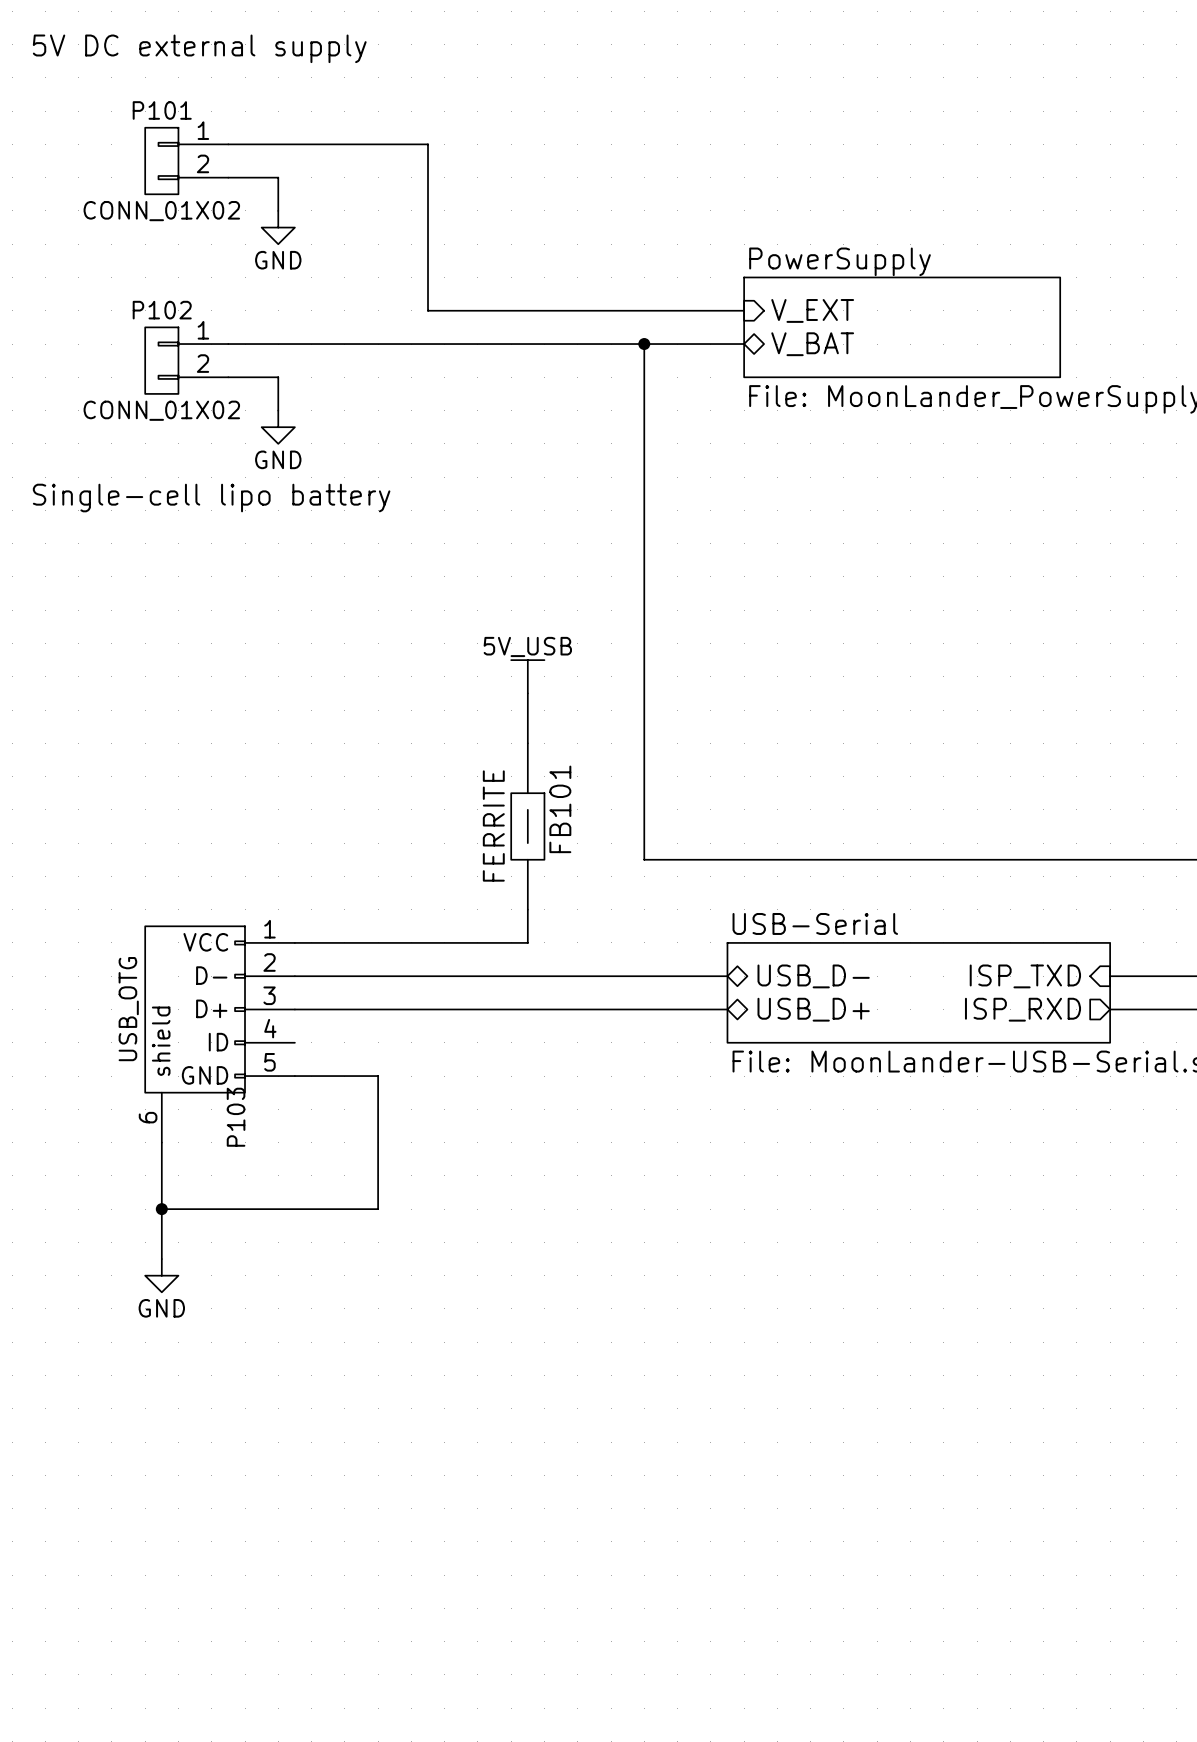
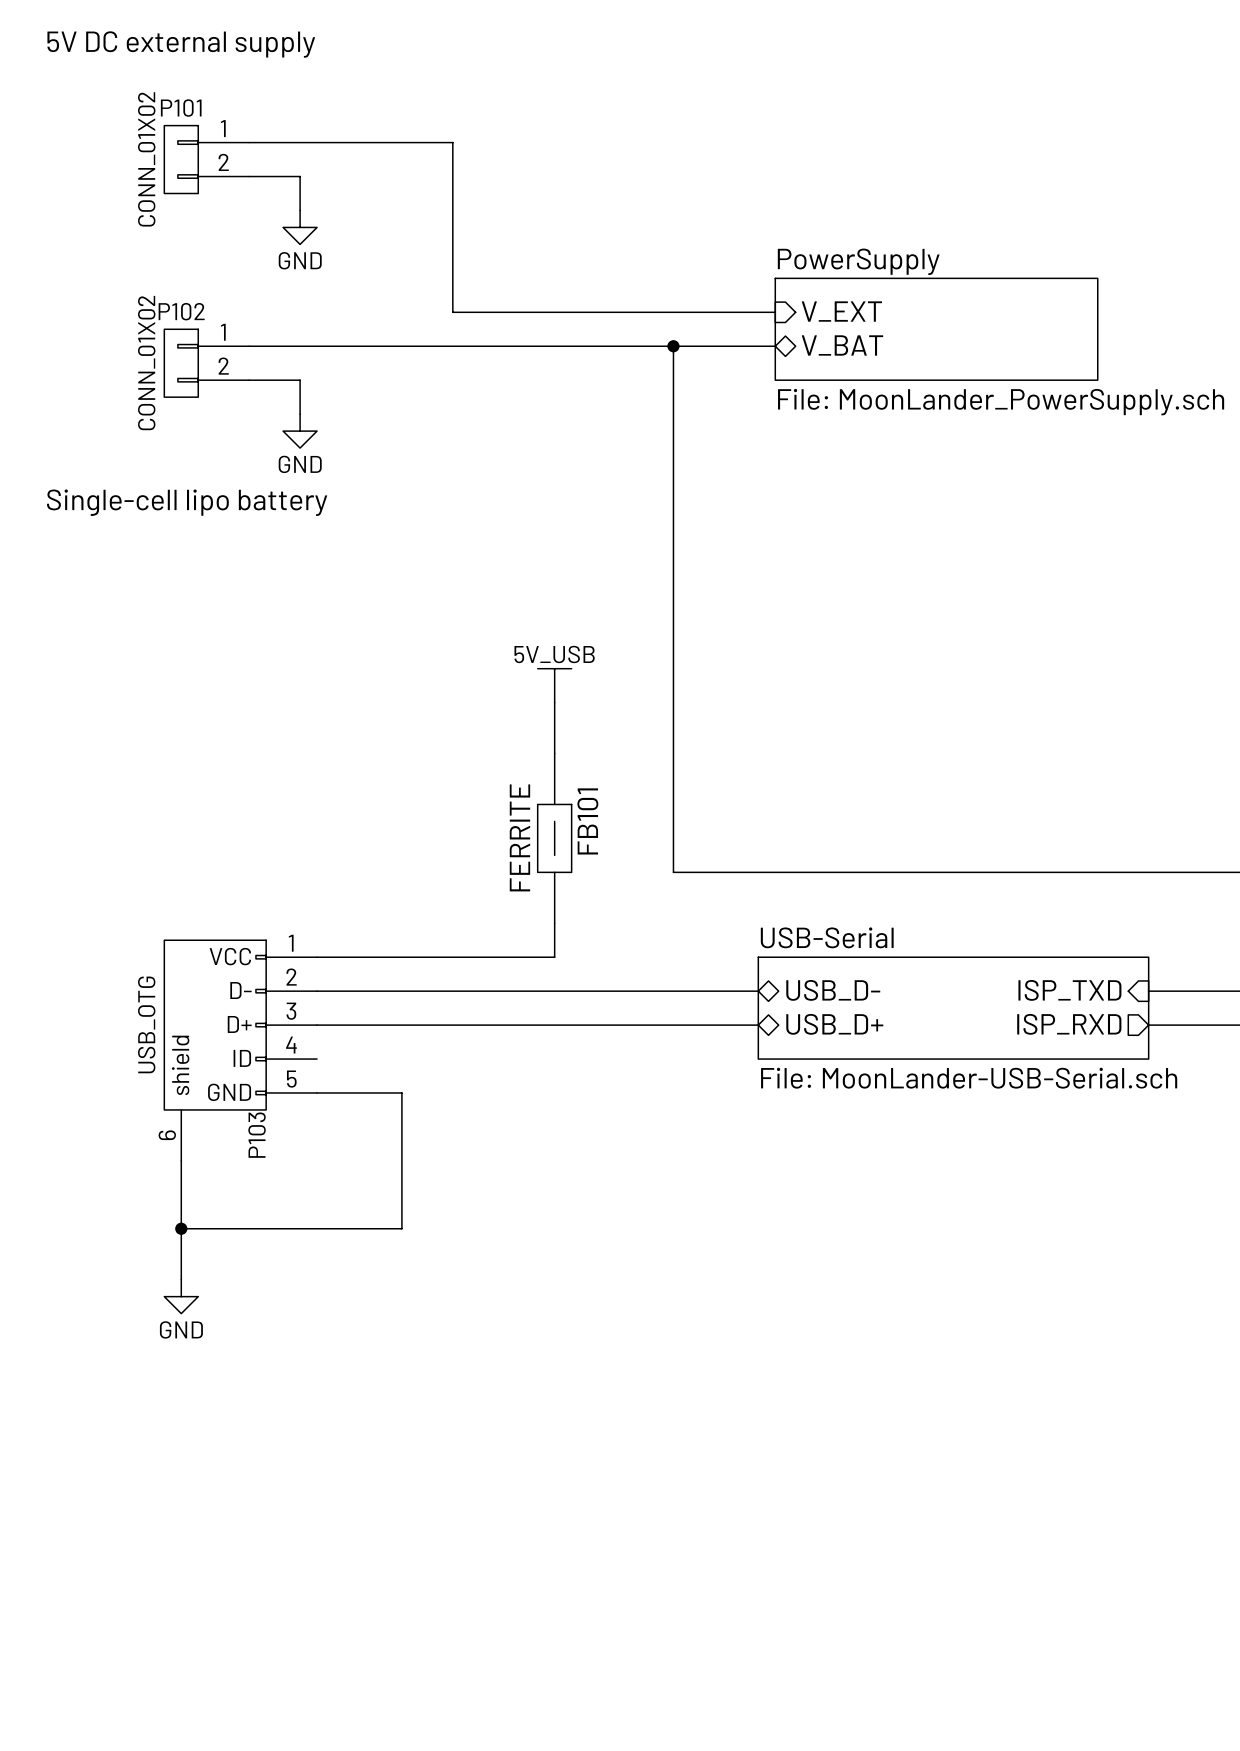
P101 value rotation: 0° (161, 211) -> 90° counterclockwise (146, 159)
P102 value rotation: 0° (161, 410) -> 90° counterclockwise (146, 363)

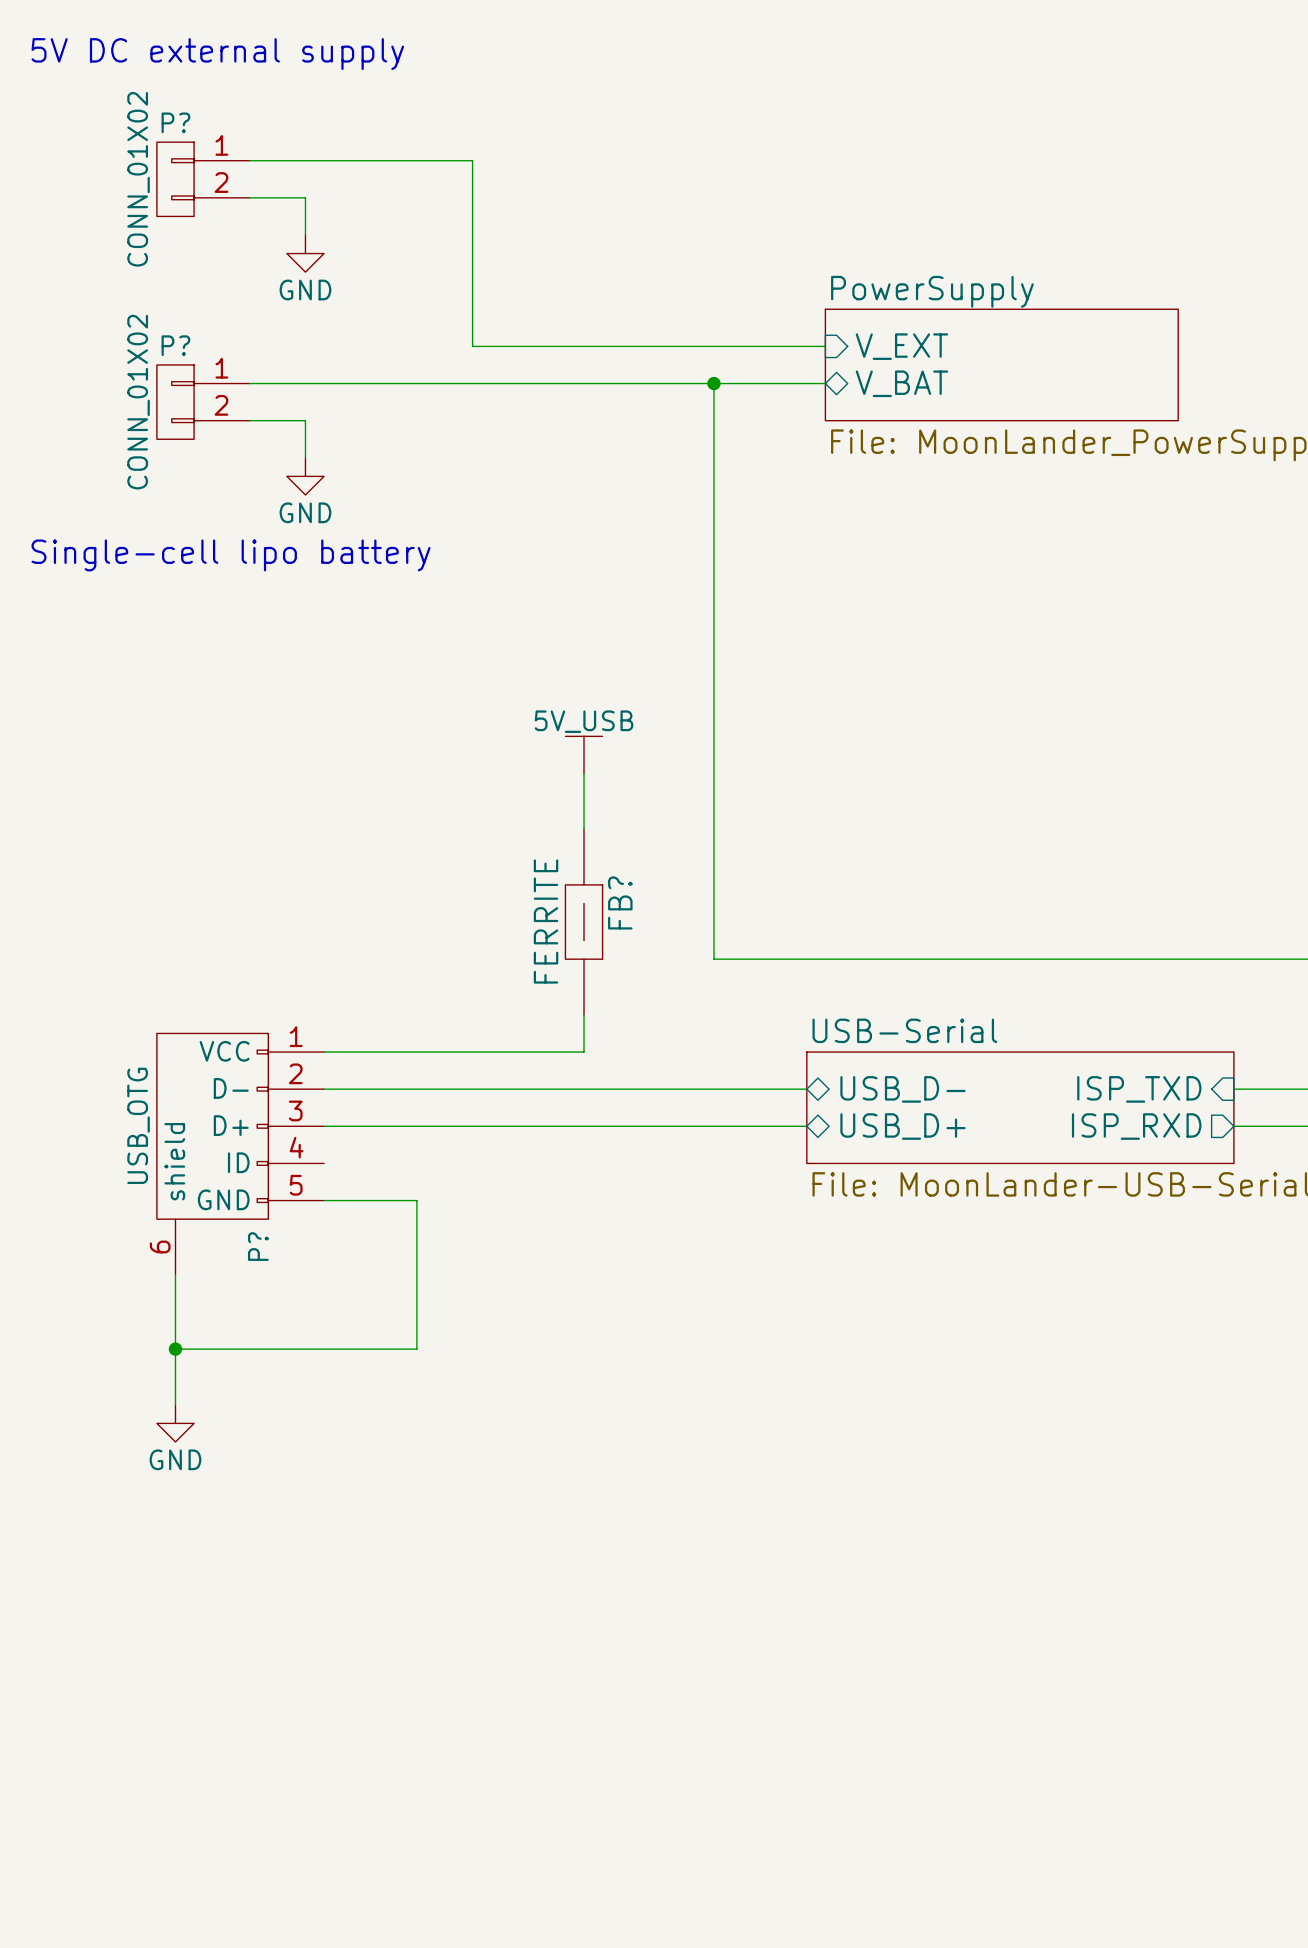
P101 name: P101 (181, 108) -> P? (175, 122)
P102 name: P102 (181, 311) -> P? (175, 345)
FB101 name: FB101 (587, 821) -> FB? (620, 902)
P103 name: P103 (257, 1135) -> P? (258, 1246)

